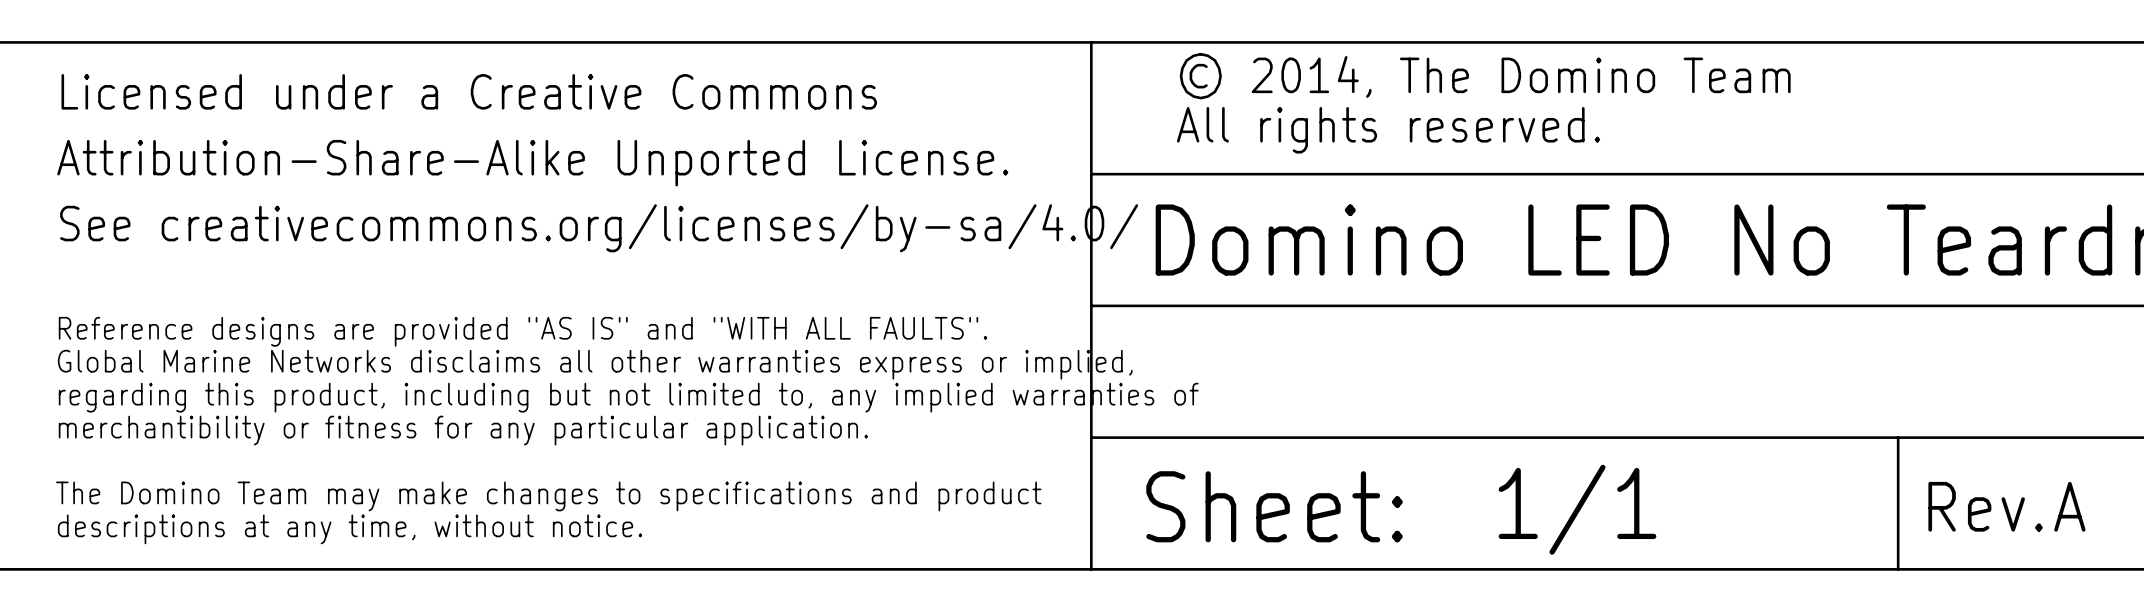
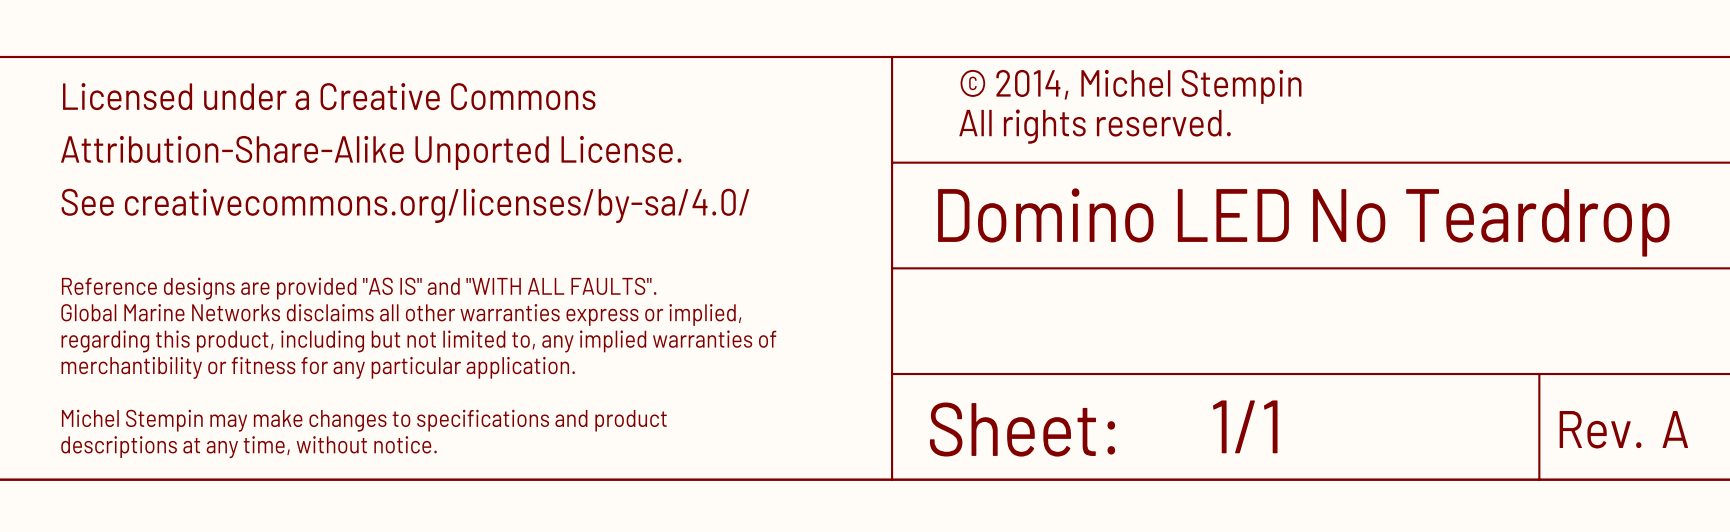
text: © 2014, The Domino Team (1485, 76) -> © 2014, Michel Stempin (1130, 86)
text: The Domino Team may make changes to specifications and product (548, 496) -> Michel Stempin may make changes to specifications and product (364, 420)

